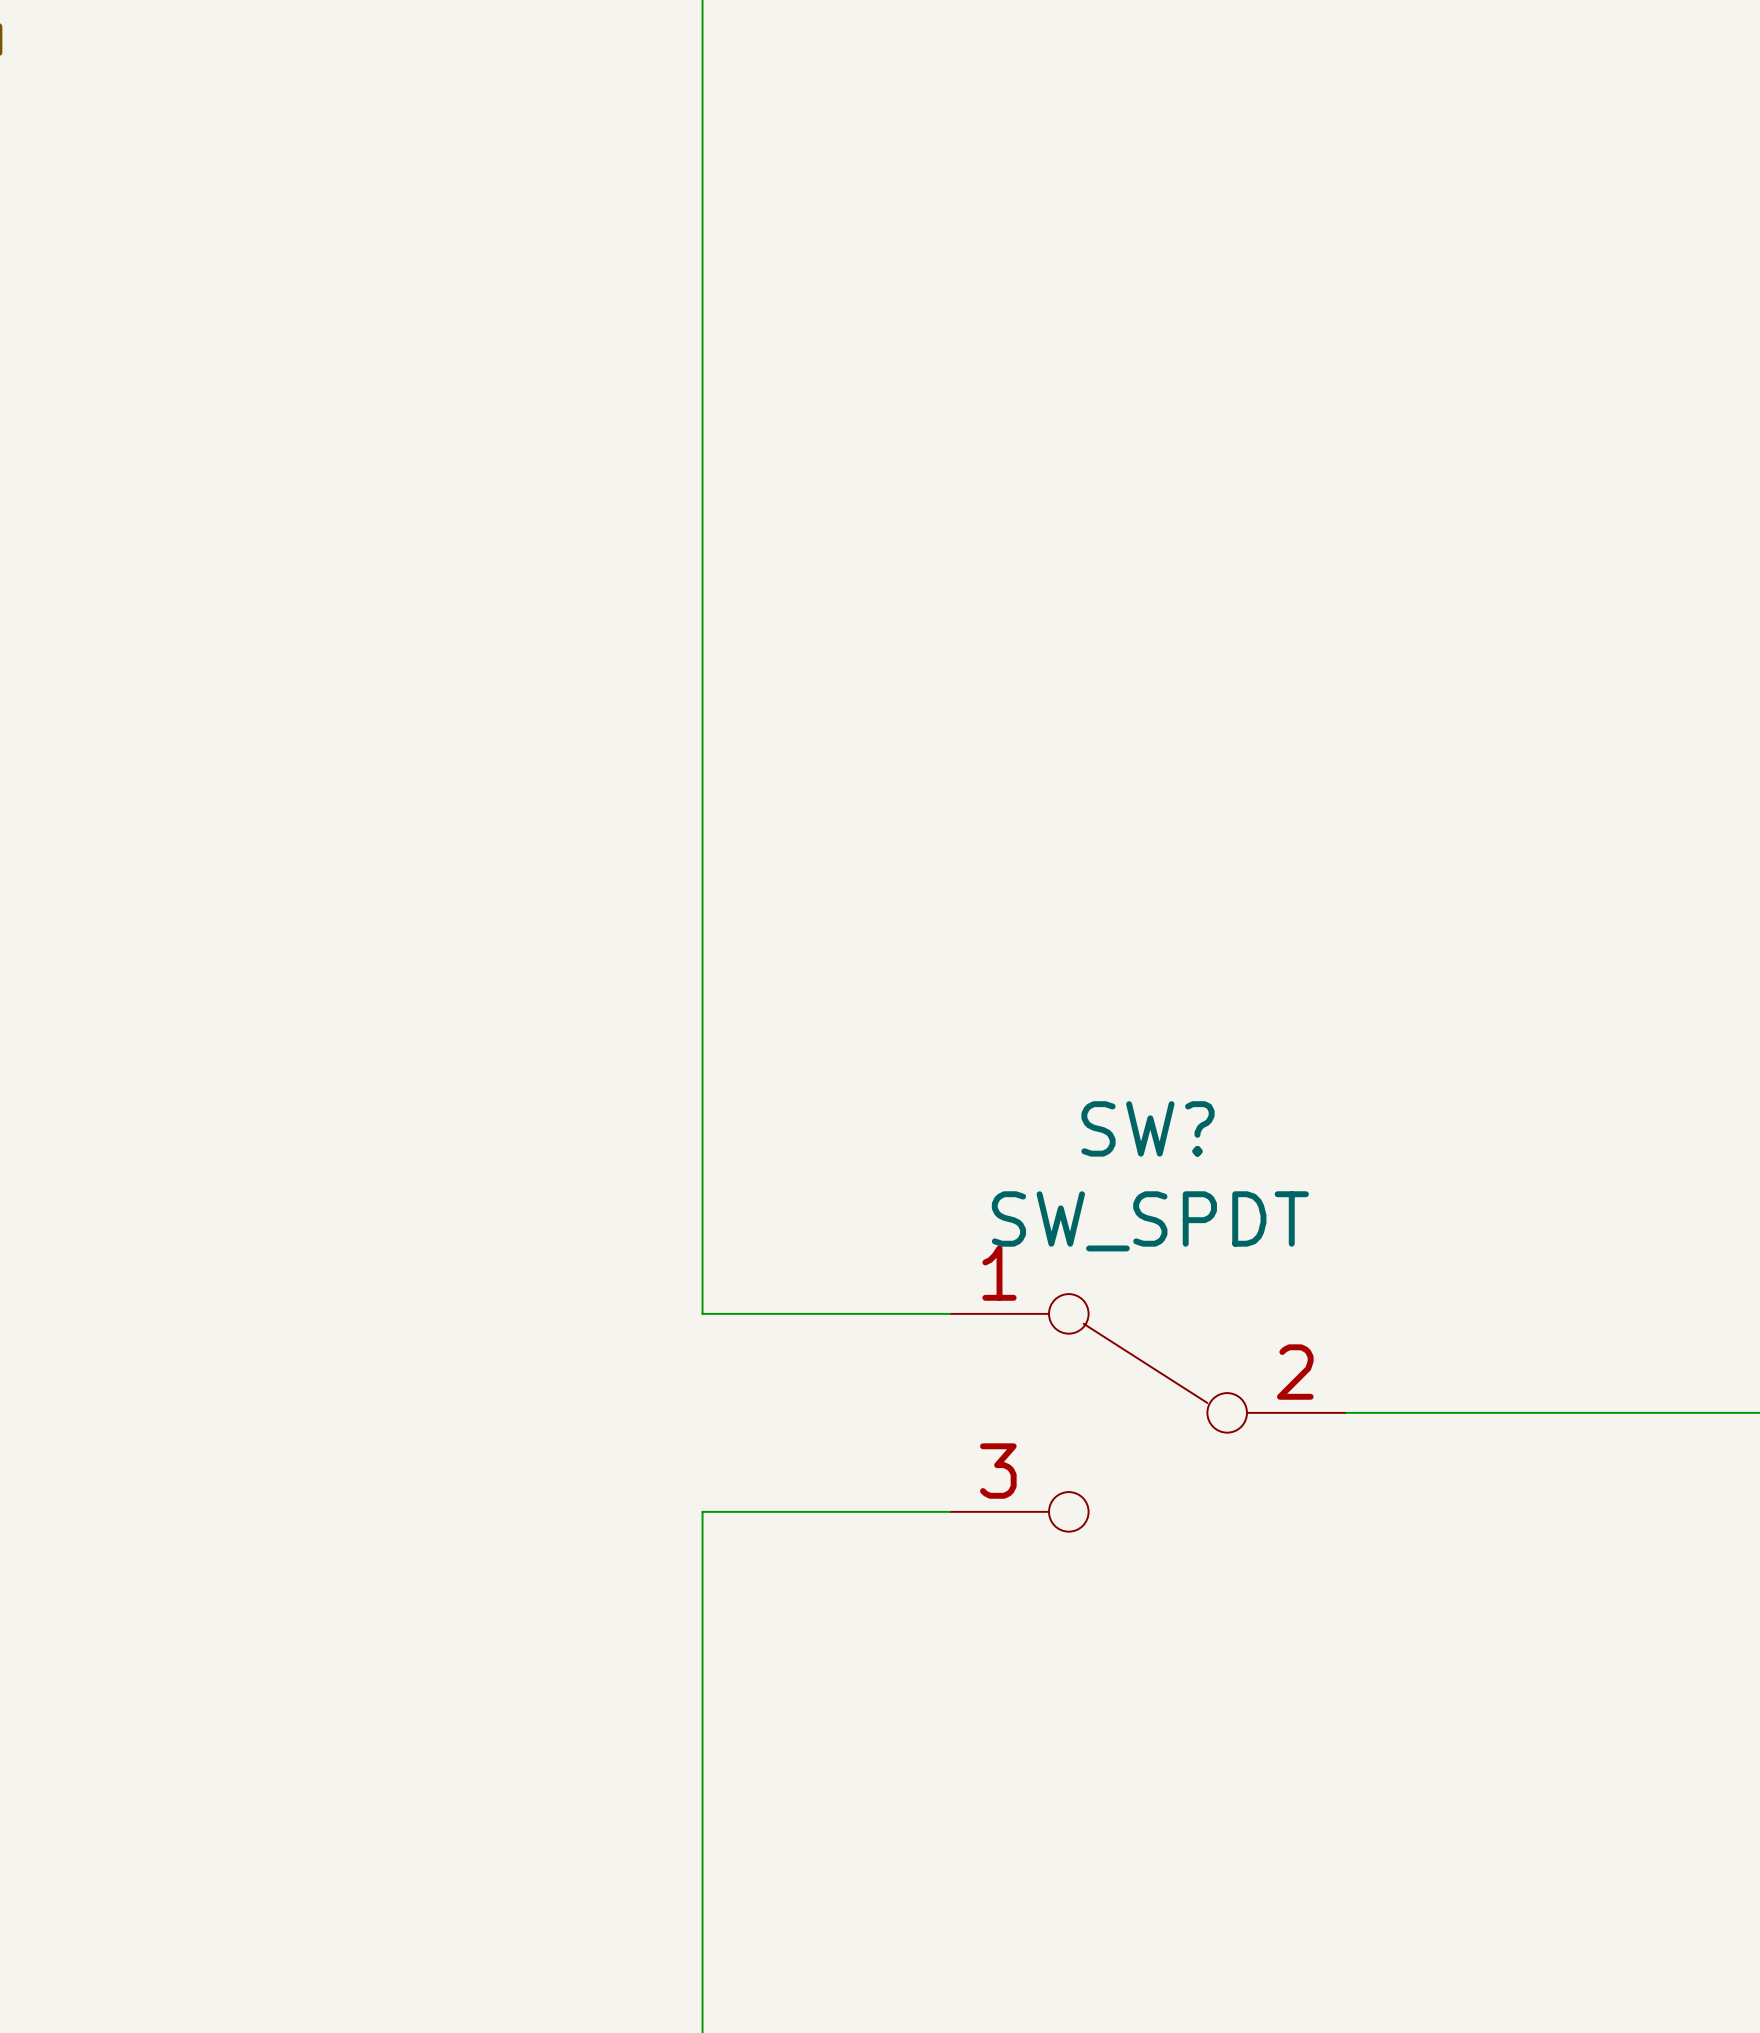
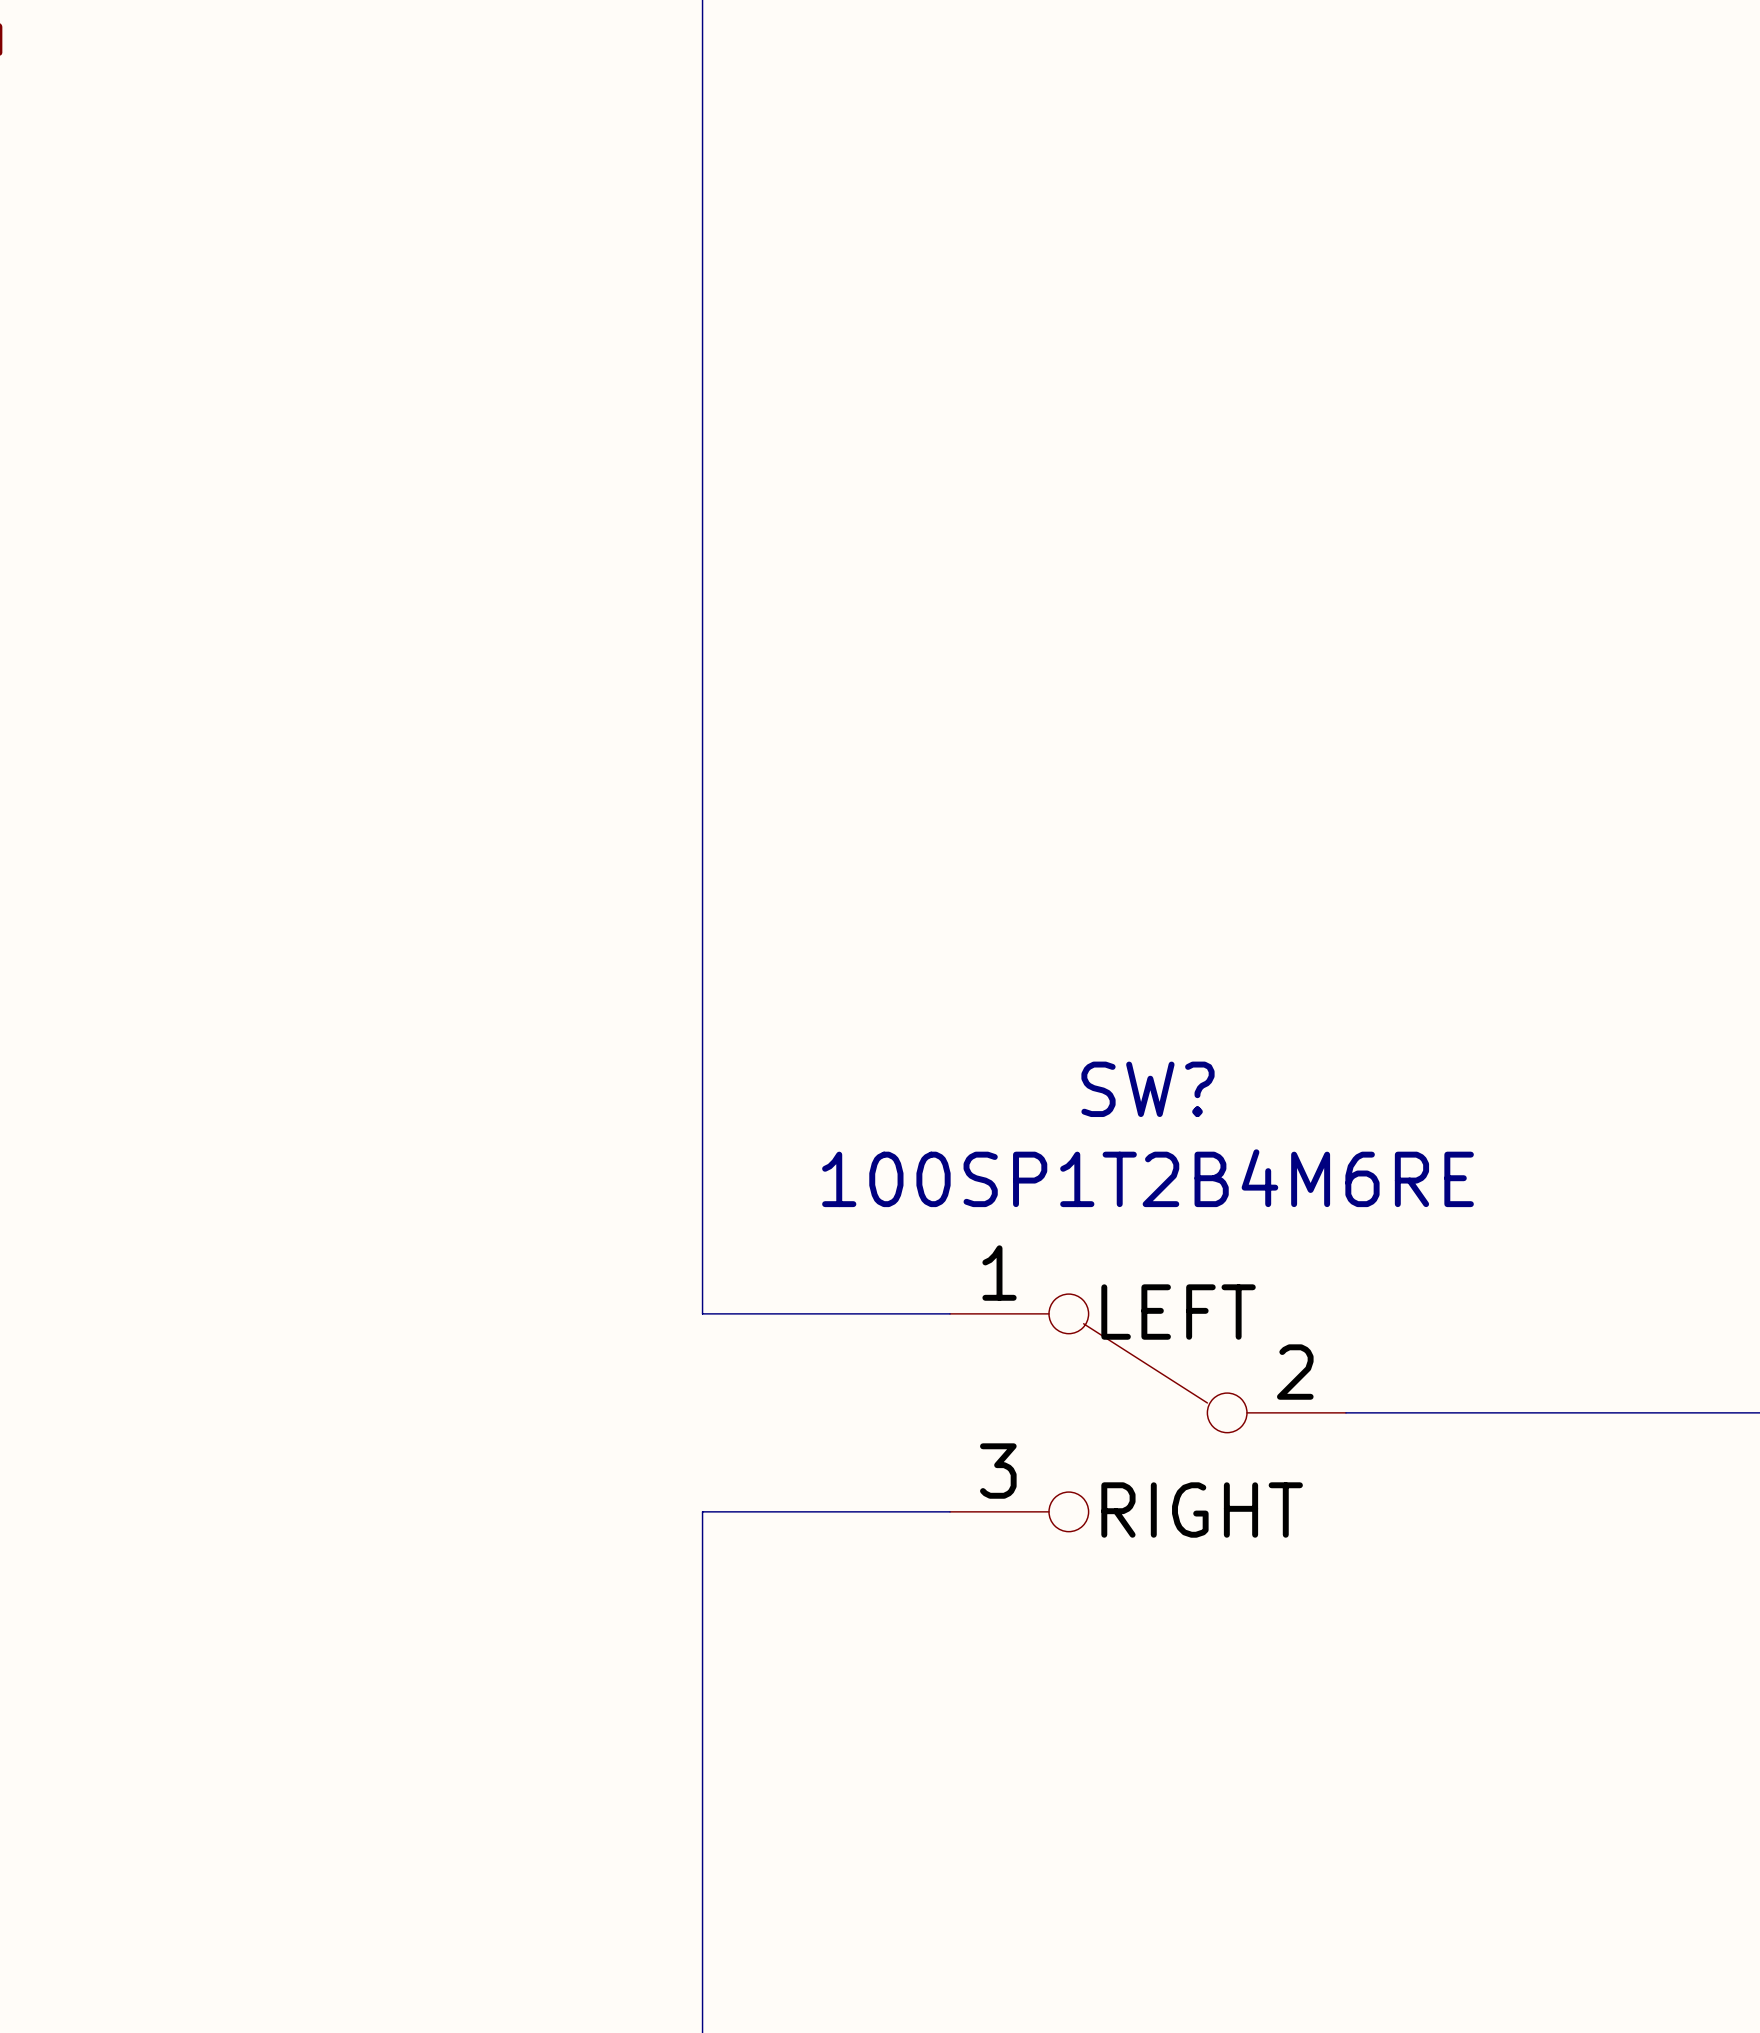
SW? name position: SW? (1148, 1128) -> SW? (1148, 1089)
SW? value: SW_SPDT (1150, 1221) -> 100SP1T2B4M6RE (1148, 1178)
SW? pin name: none -> LEFT (1178, 1312)
SW? pin name: none -> RIGHT (1202, 1510)

